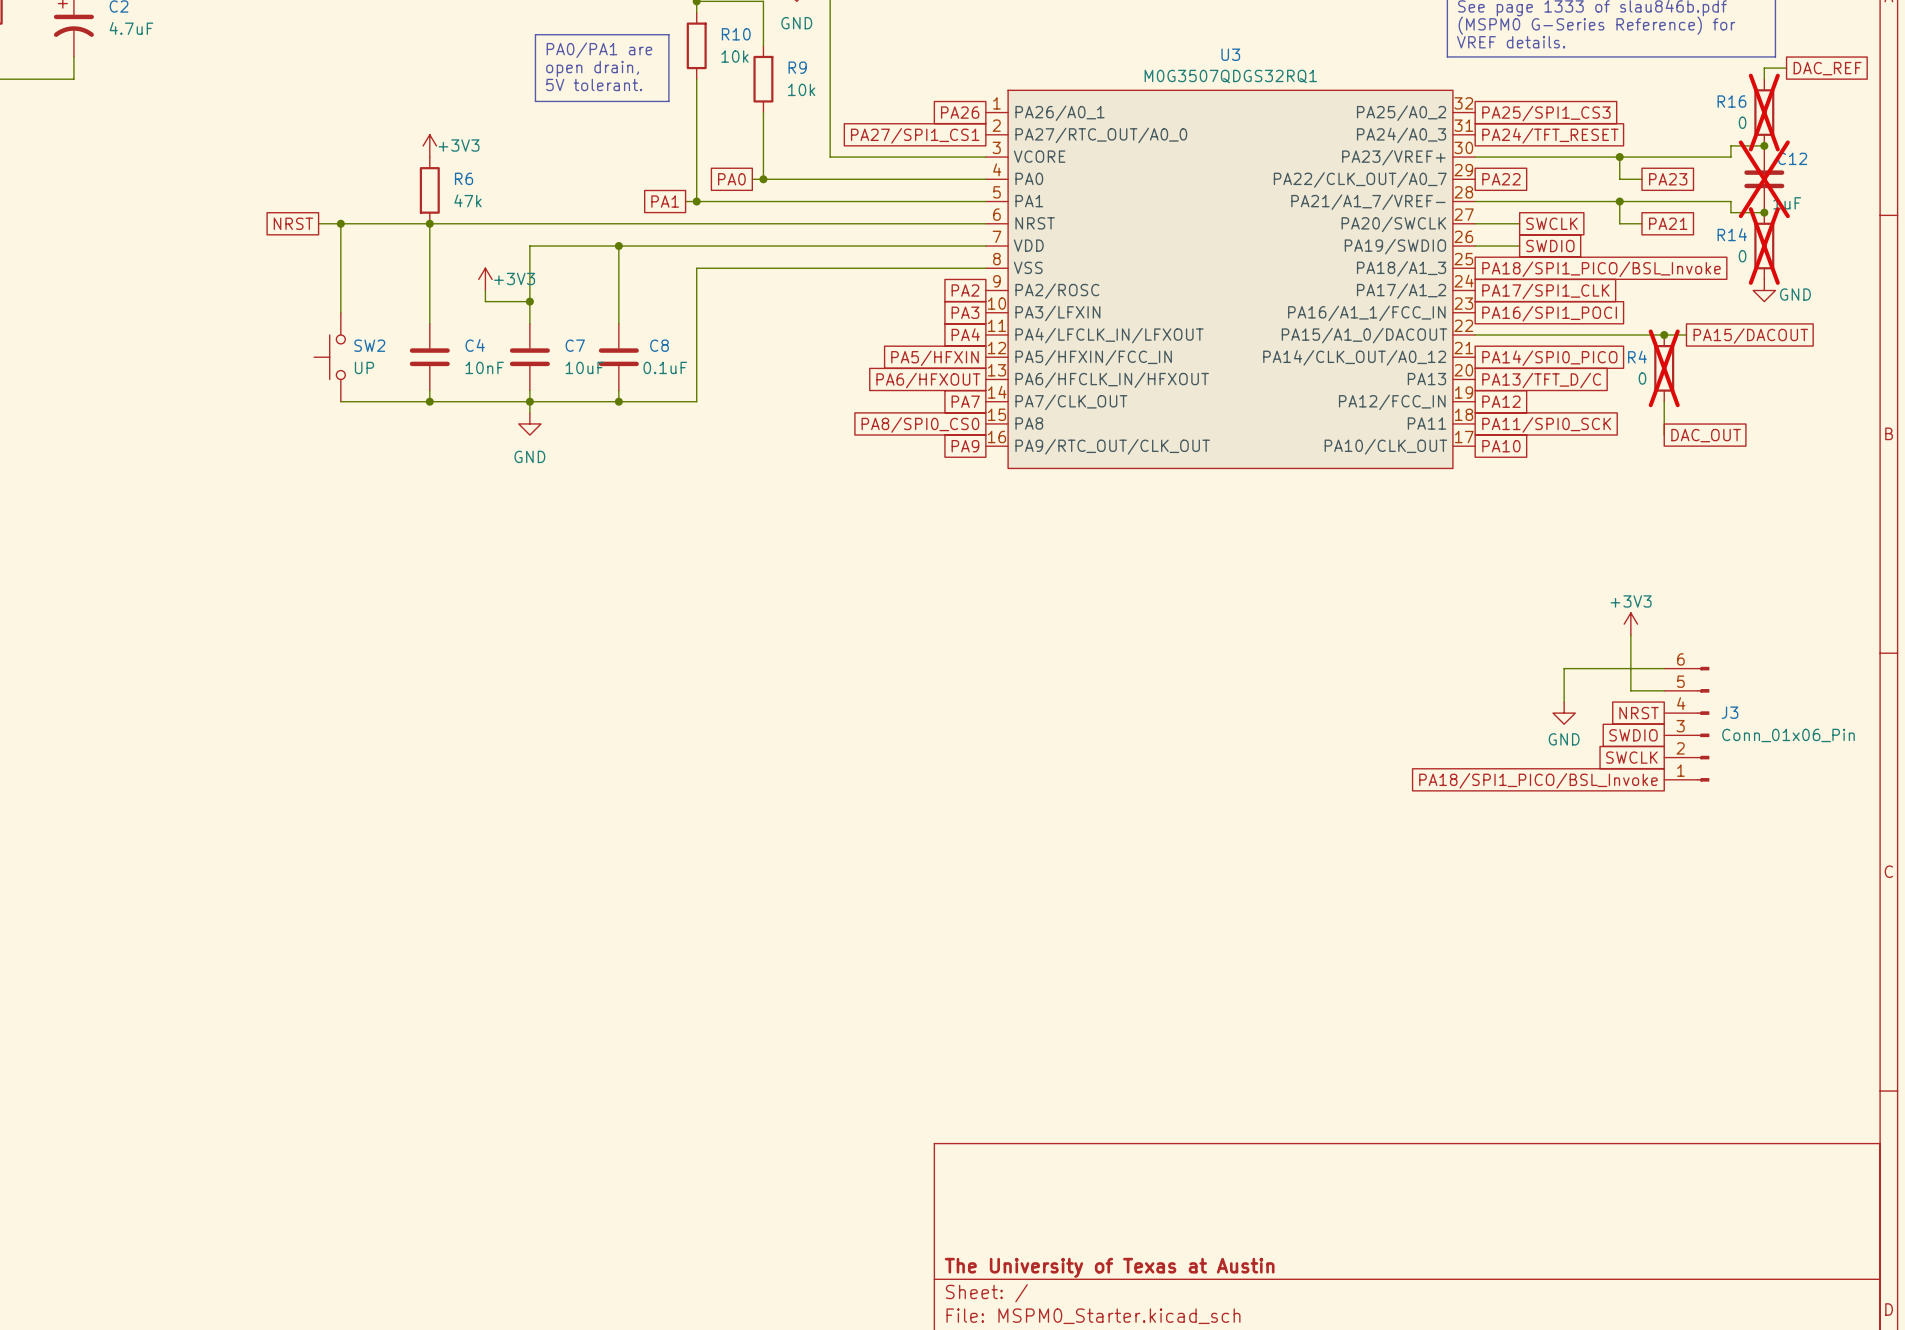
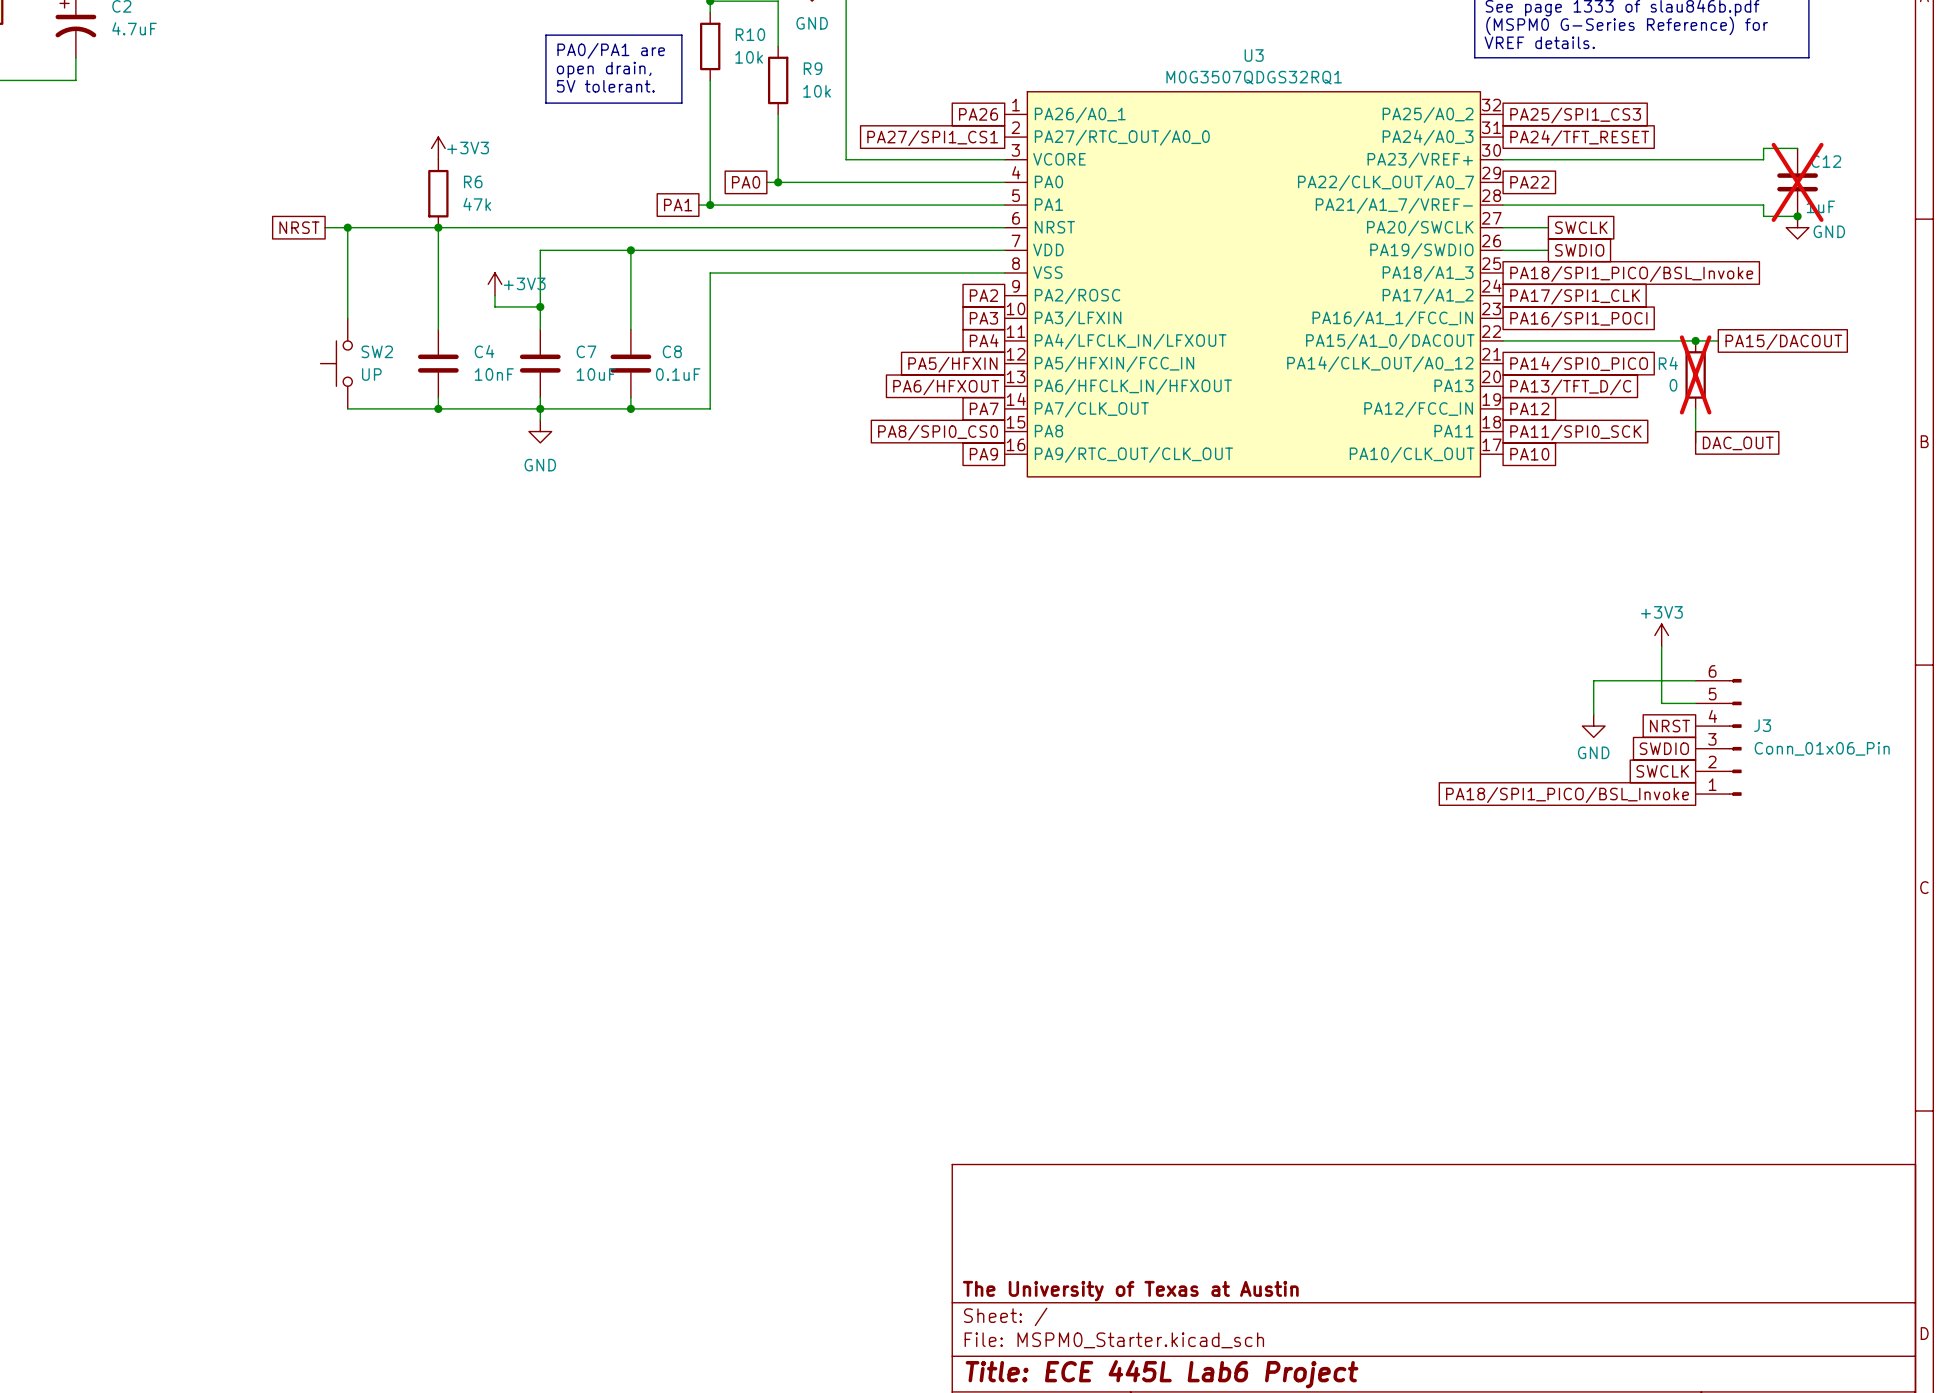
wire: (1786, 68) (1764, 68) (1764, 79) -> none
global label: DAC_REF (1827, 68) -> none
R16: 0 (1764, 112) -> none
junction: (1764, 145) -> none
wire: (1619, 157) (1619, 179) (1641, 179) -> none
junction: (1619, 157) -> none
global label: PA23 (1668, 179) -> none
wire: (1619, 201) (1619, 223) (1641, 223) -> none
junction: (1619, 201) -> none
global label: PA21 (1668, 223) -> none
R14: 0 (1764, 246) -> none
power symbol position: GND (1764, 290) -> GND (1797, 227)

